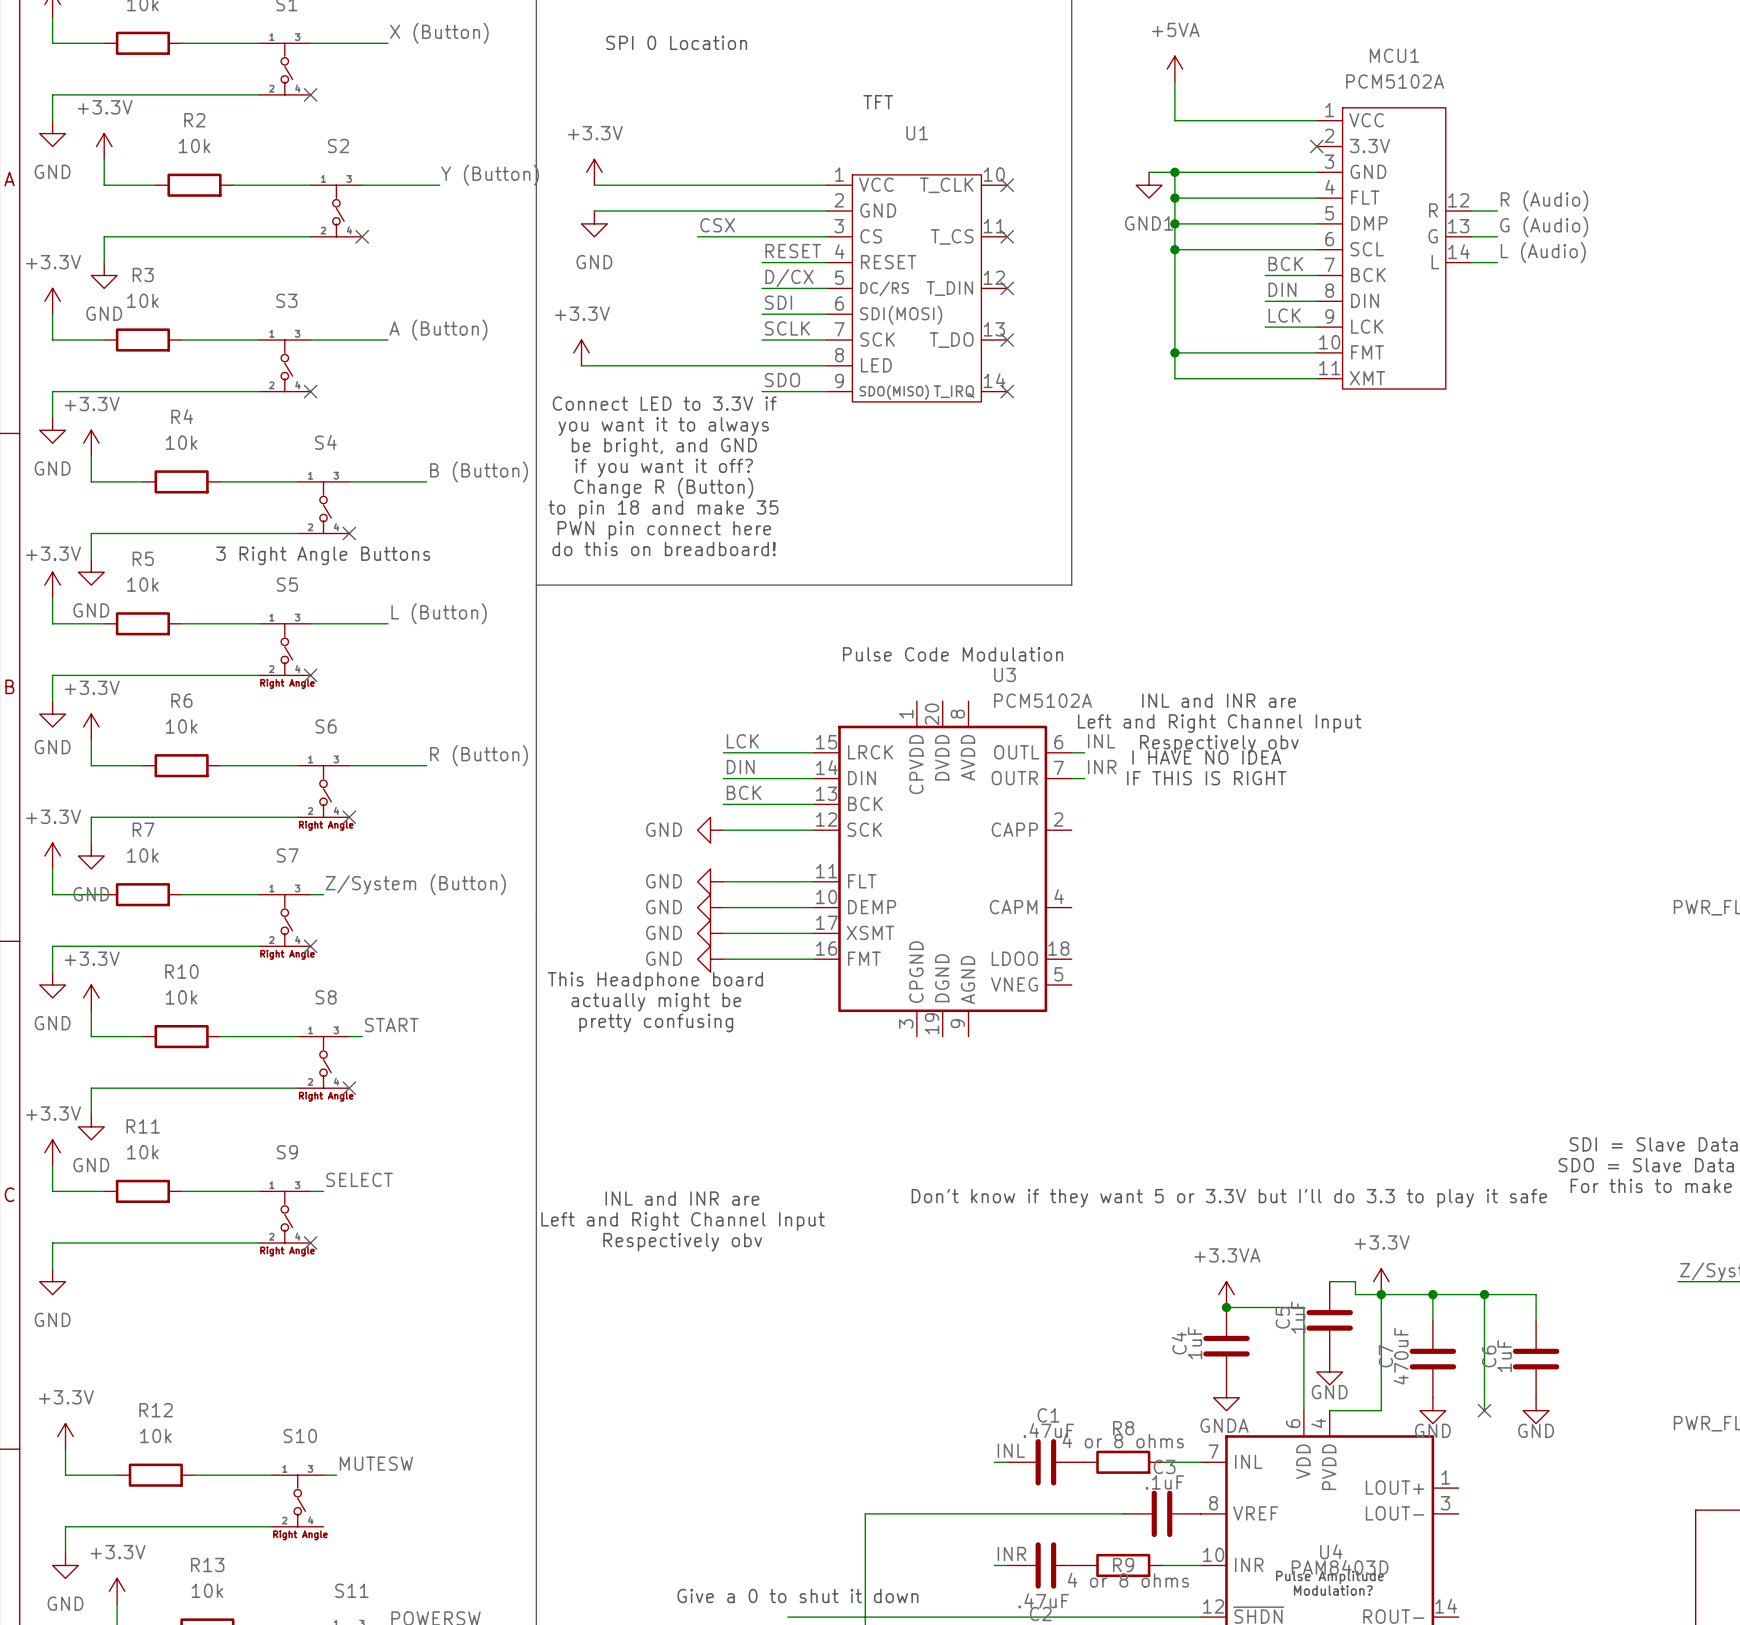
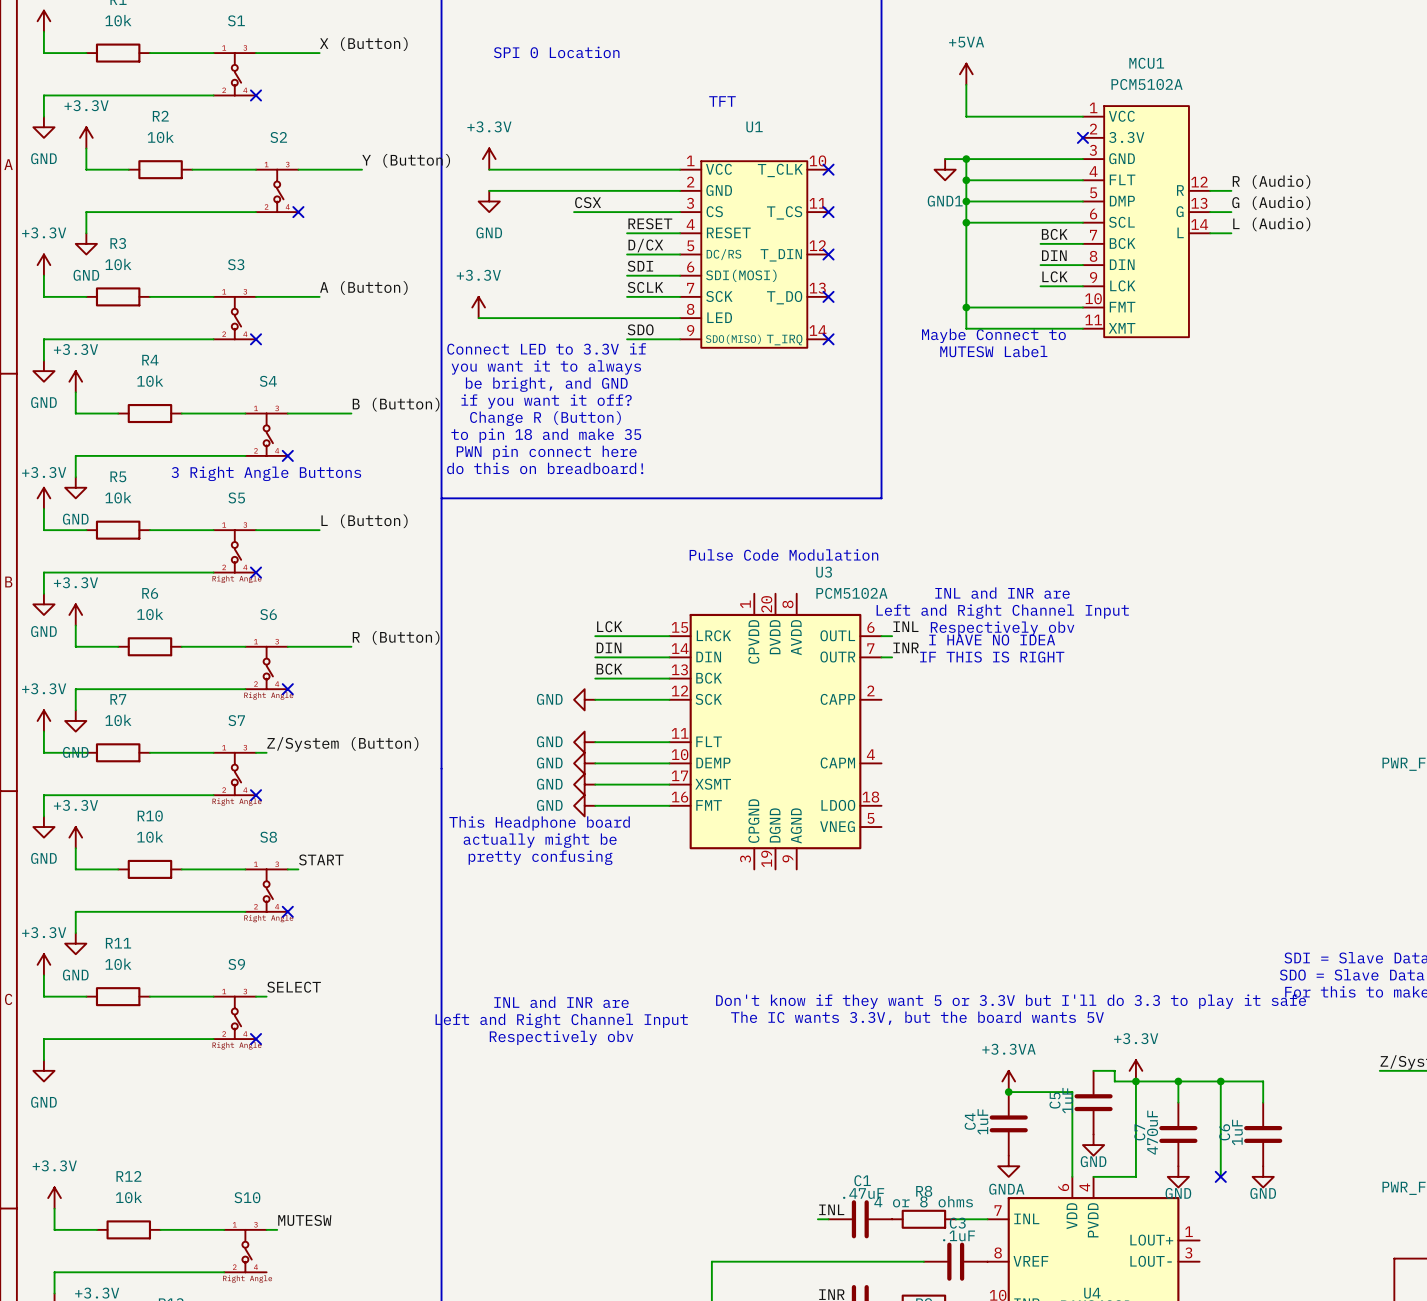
text: none -> Maybe Connect to (993, 335)
text: none -> MUTESW Label (993, 351)
text: none -> The IC wants 3.3V, but the board wants 5V (917, 1018)

